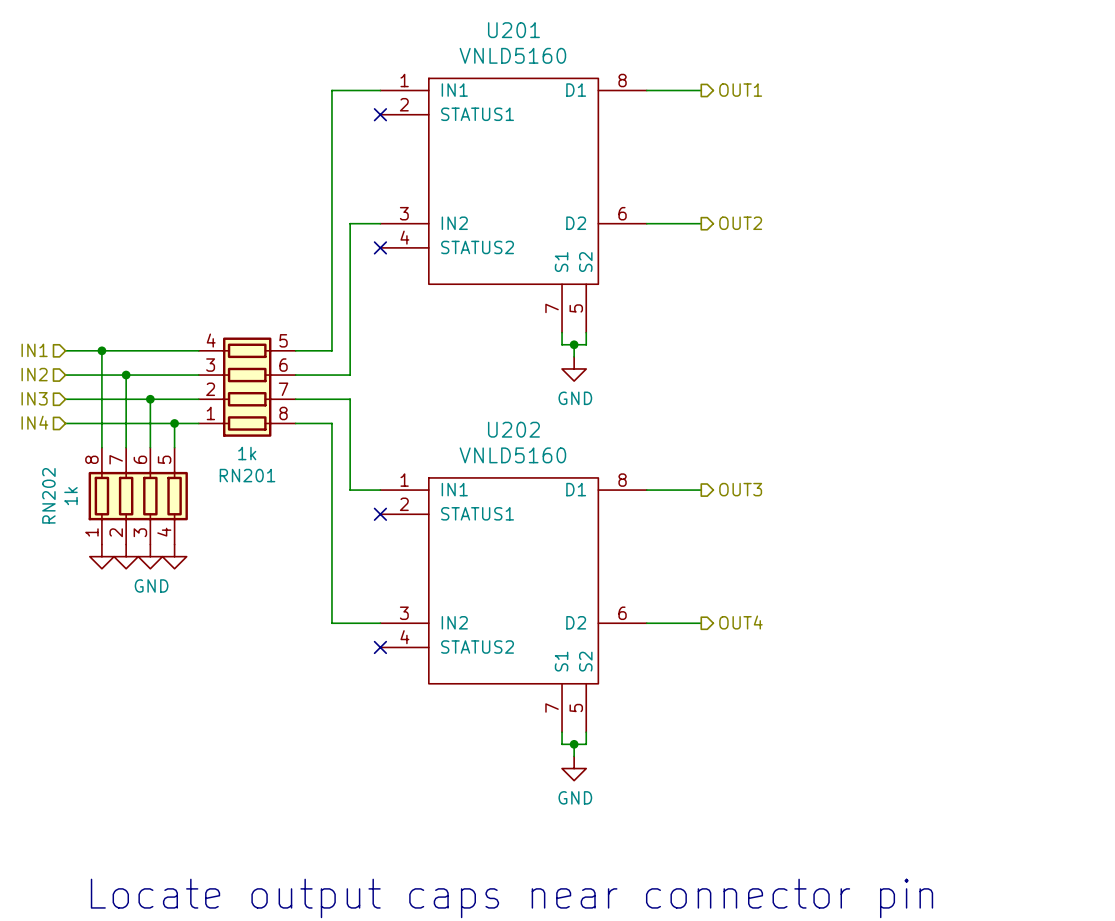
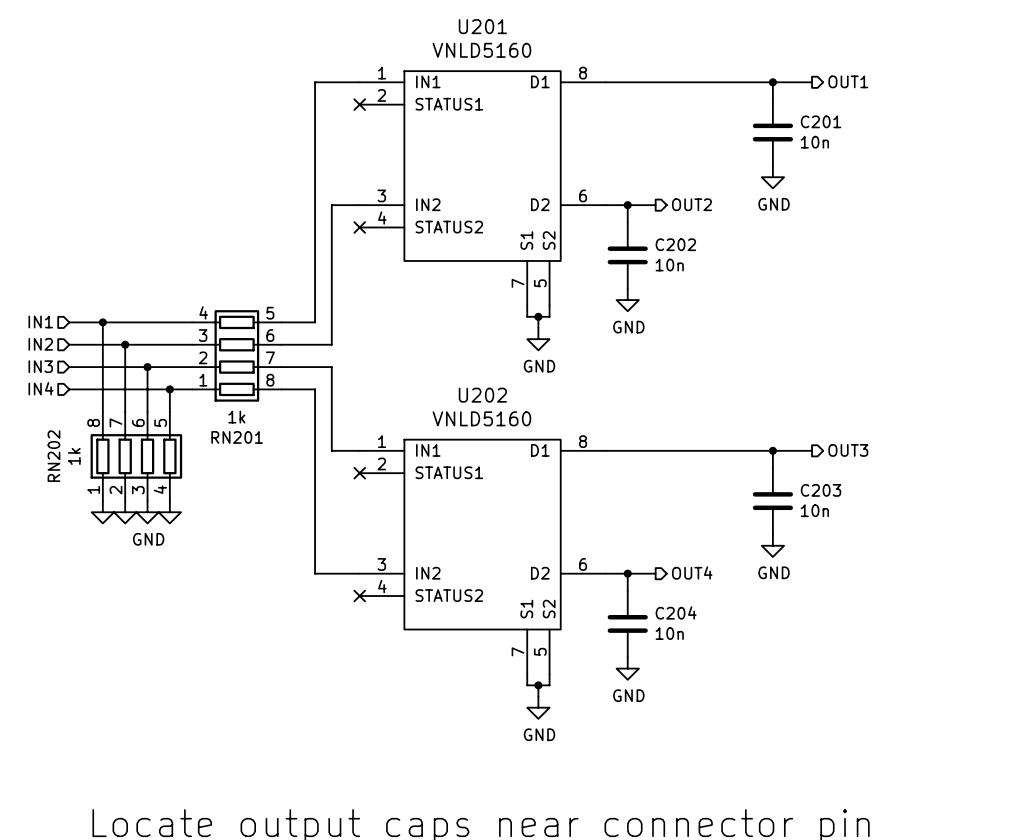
wire: none -> (655, 82) (812, 82)
hierarchical label position: OUT1 (740, 90) -> OUT1 (848, 81)
wire: none -> (772, 82) (772, 99)
junction: none -> (772, 82)
C201: none -> 10n (772, 132)
power symbol: none -> GND (772, 177)
wire: none -> (627, 205) (627, 221)
junction: none -> (627, 205)
C202: none -> 10n (627, 255)
power symbol: none -> GND (627, 300)
hierarchical label position: OUT3 (740, 489) -> OUT3 (848, 450)
wire: none -> (655, 450) (812, 450)
wire: none -> (772, 450) (772, 467)
junction: none -> (772, 450)
C203: none -> 10n (772, 501)
power symbol: none -> GND (772, 545)
wire: none -> (627, 573) (627, 590)
junction: none -> (627, 573)
C204: none -> 10n (627, 623)
power symbol: none -> GND (627, 668)

